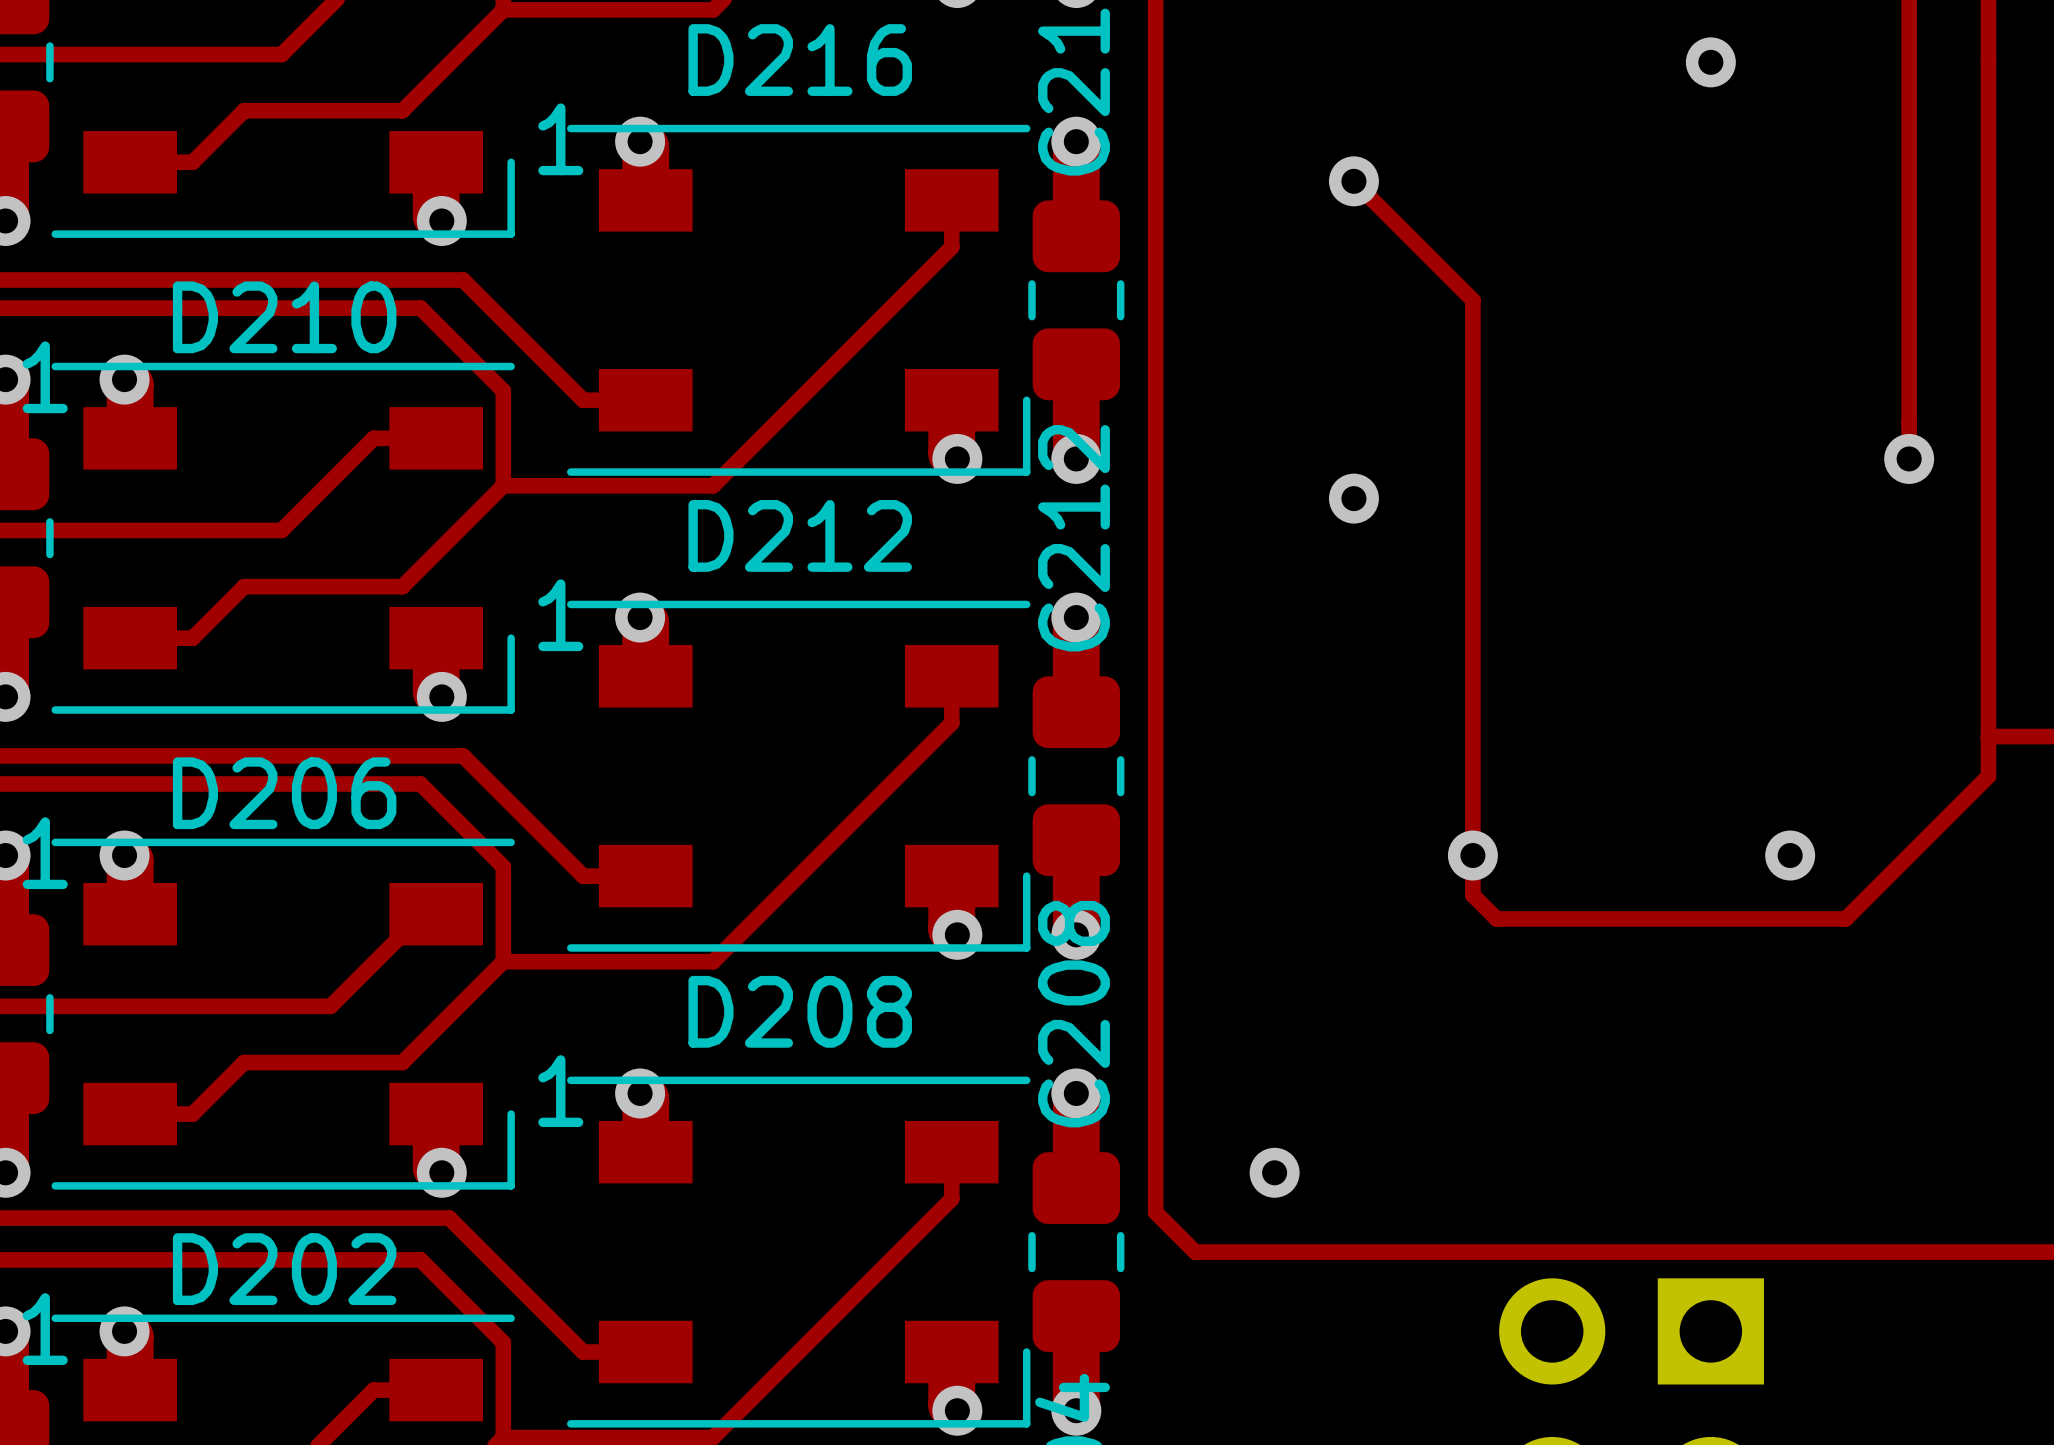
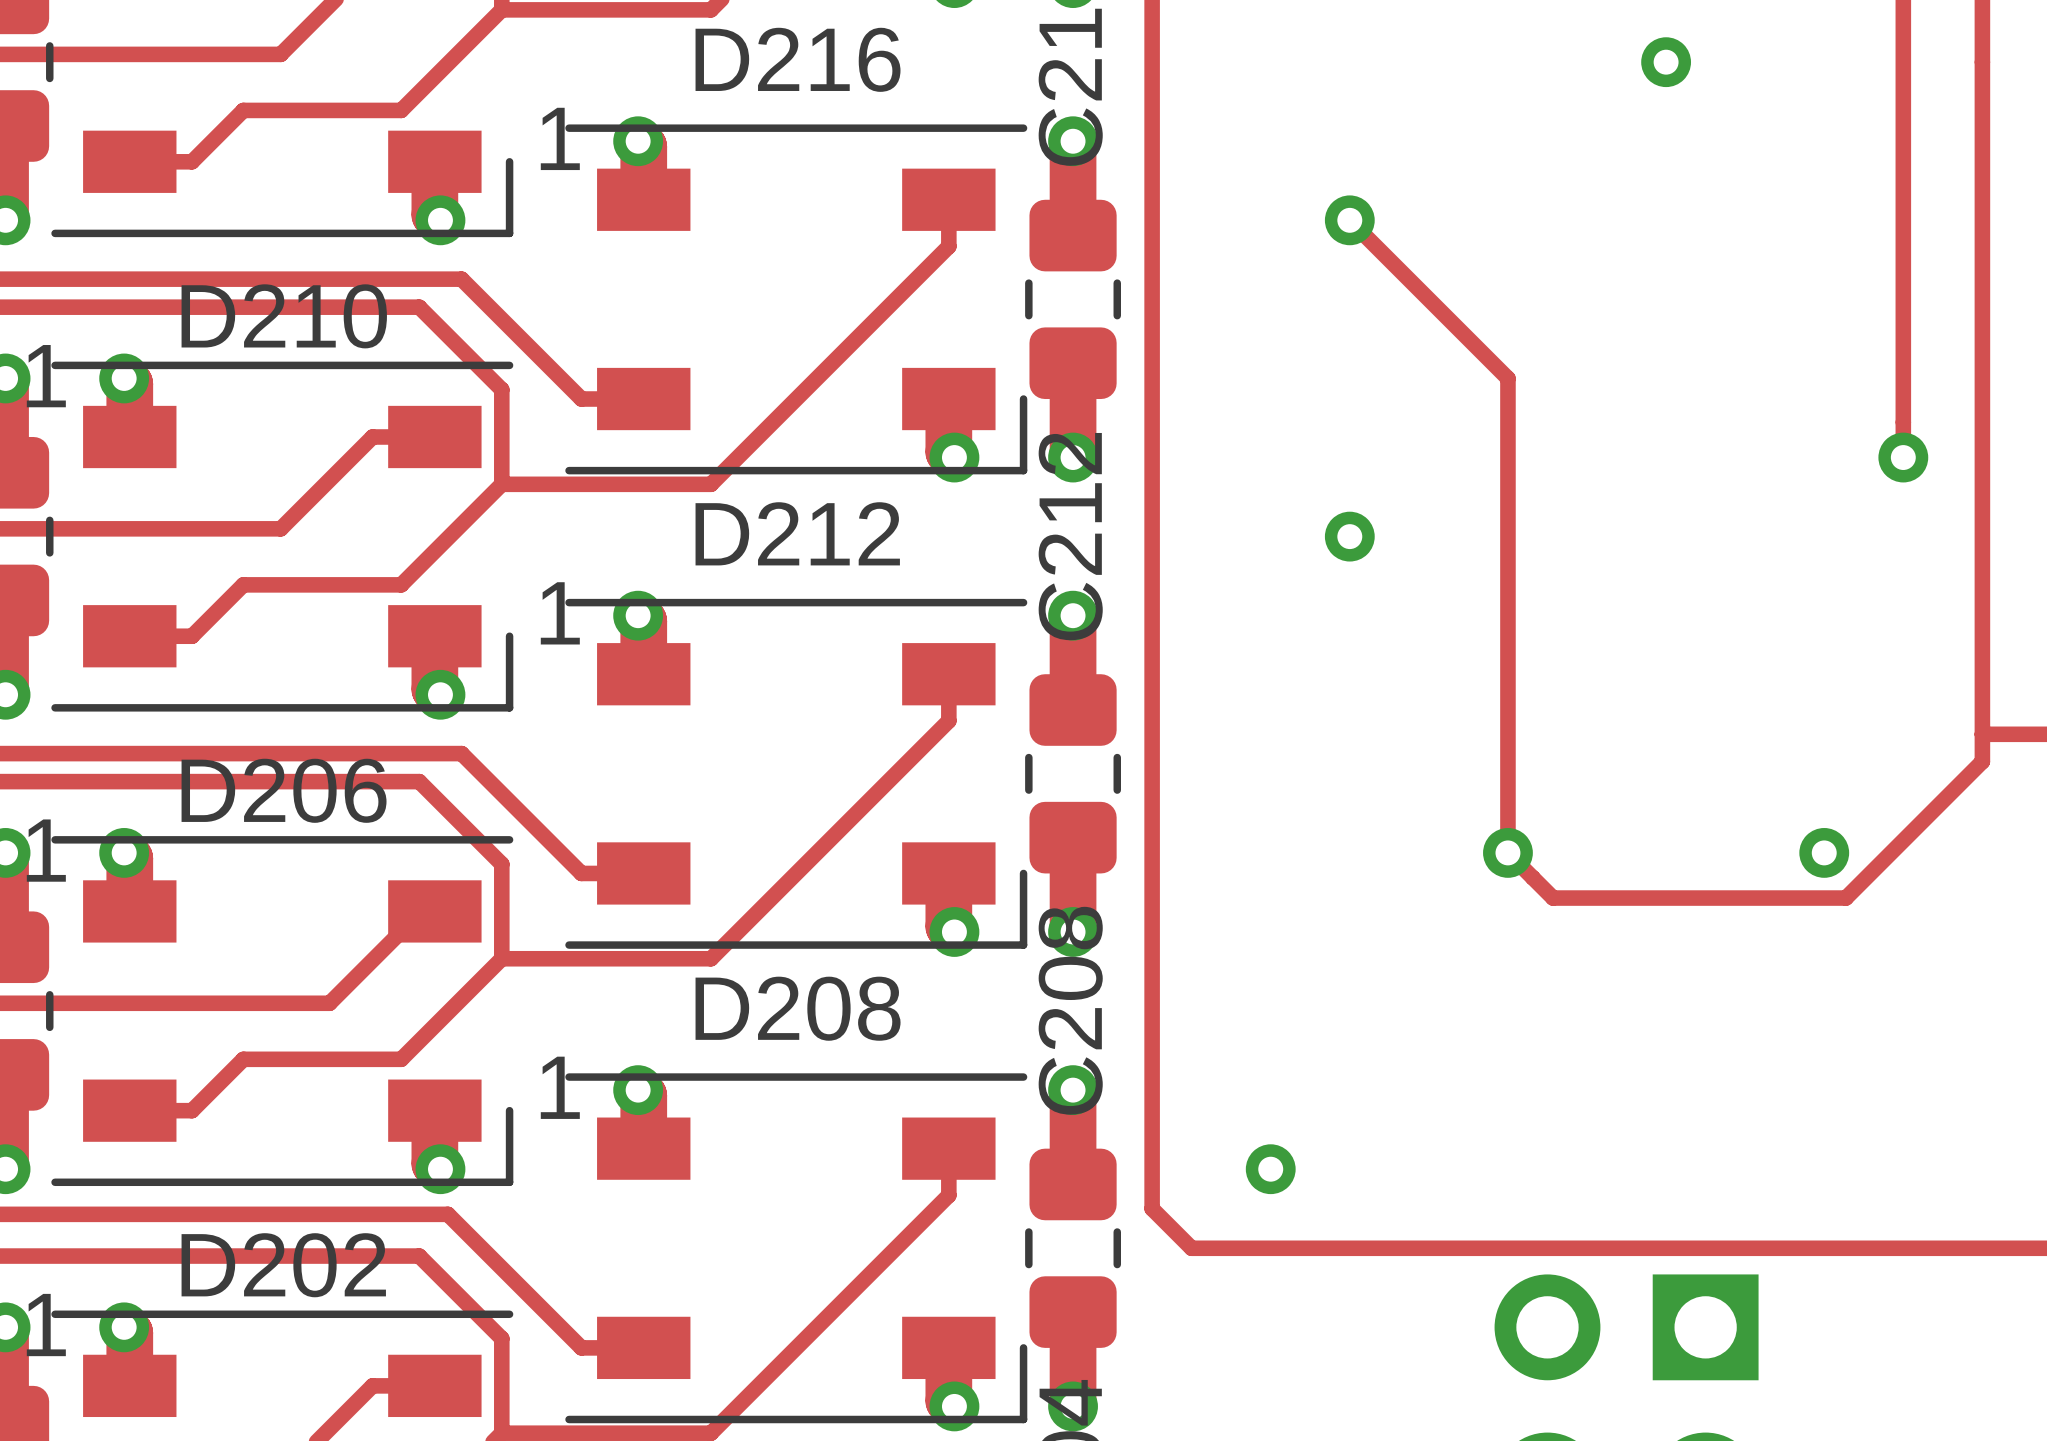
via position: (1710, 62) -> (1666, 62)
track: (1353, 181) (1472, 300) (1472, 895) (1496, 918) (1845, 918) (1988, 776) (1988, 763) -> (1349, 220) (1507, 378) (1507, 852) (1553, 898) (1845, 898) (1982, 761)
via position: (1353, 181) -> (1349, 220)
via position: (1353, 498) -> (1349, 536)
via position: (1472, 855) -> (1507, 852)
via position: (1790, 855) -> (1824, 852)

